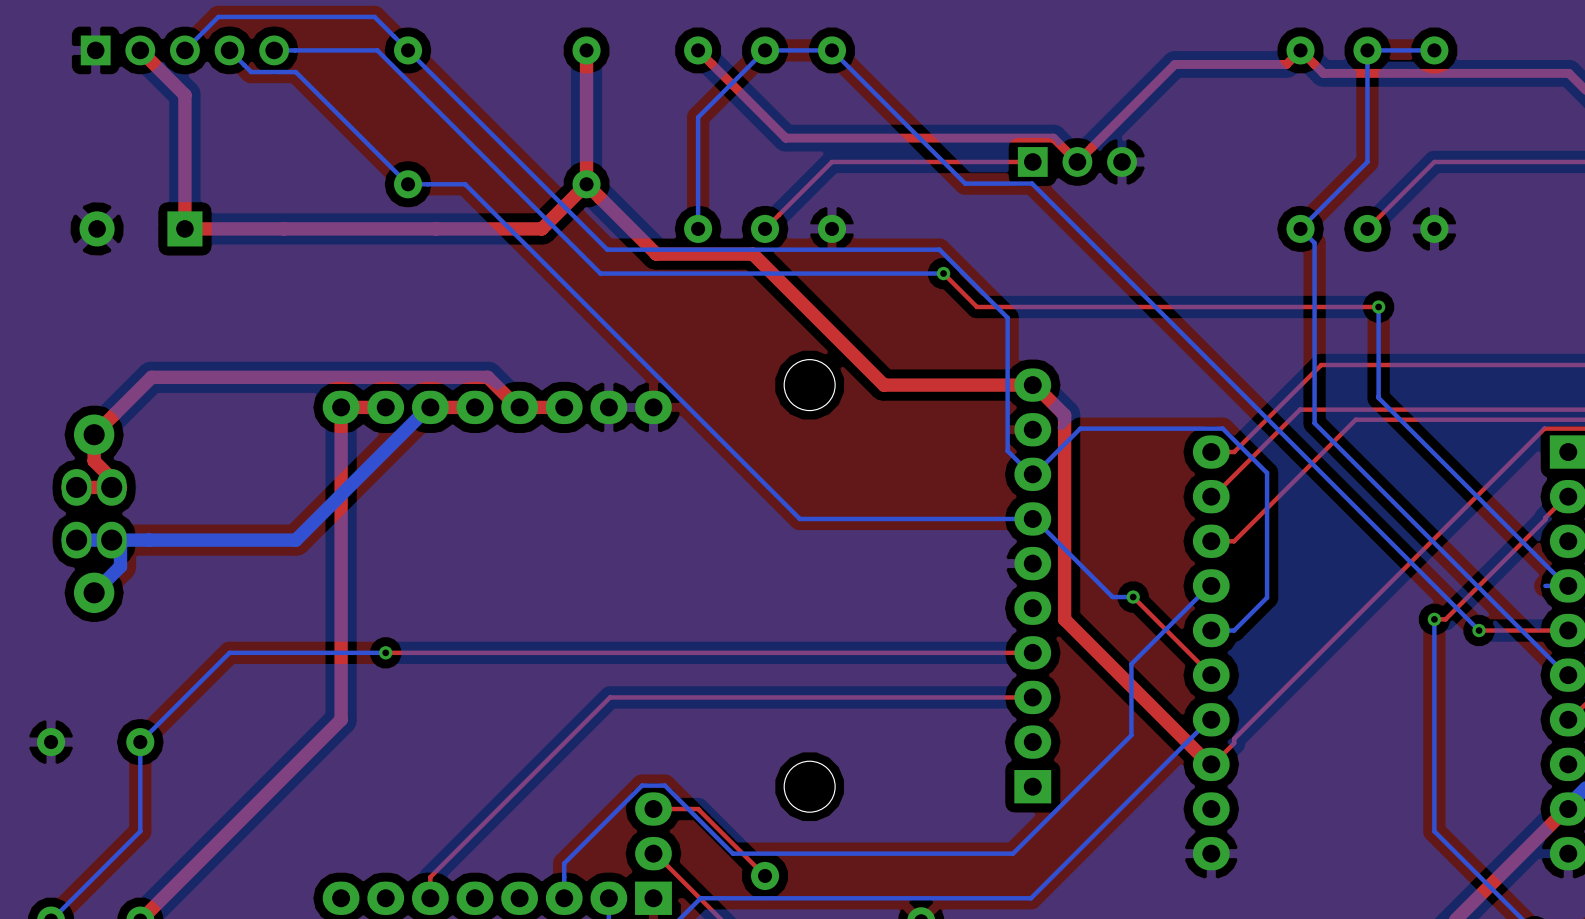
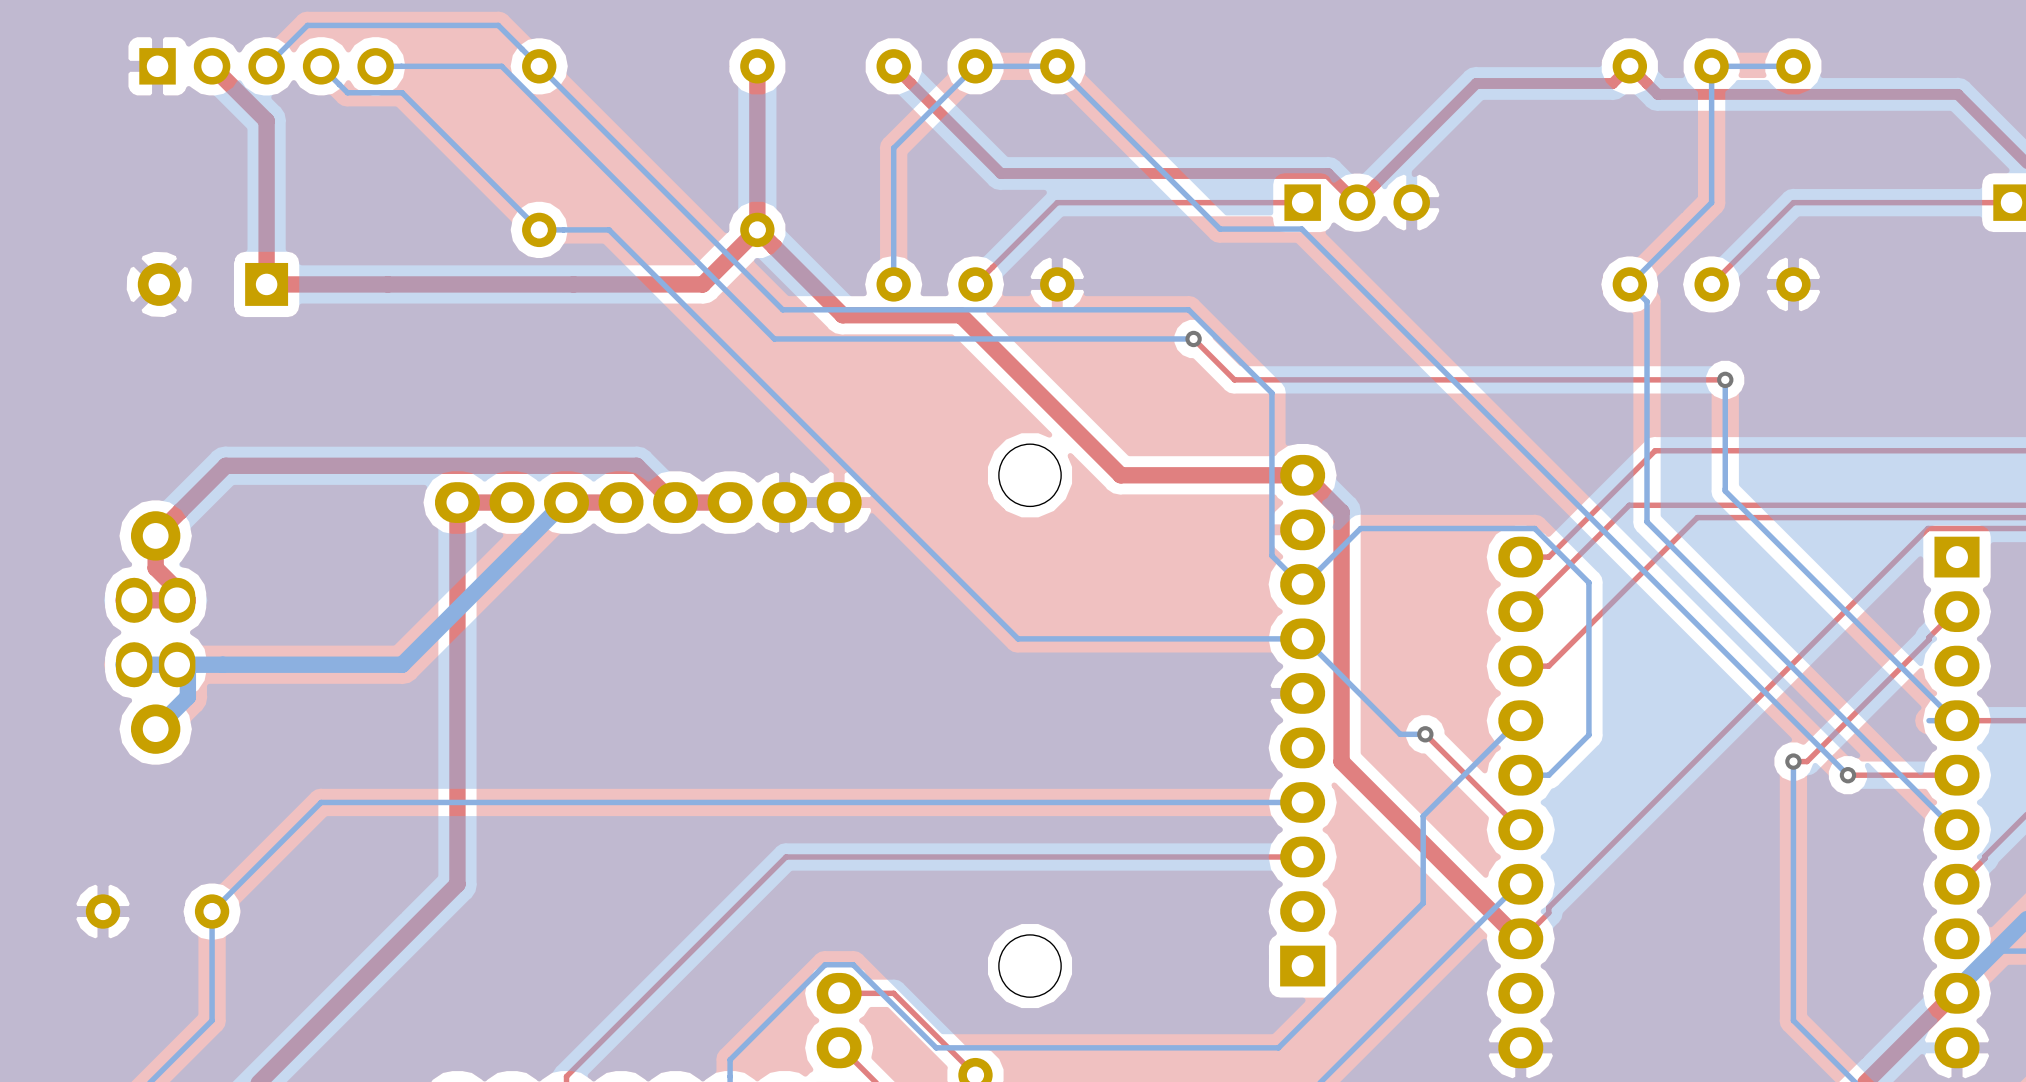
via: (385, 652) -> none
top track: (1032, 652) (385, 652) -> none
bottom track: none -> (1302, 802) (511, 802)

